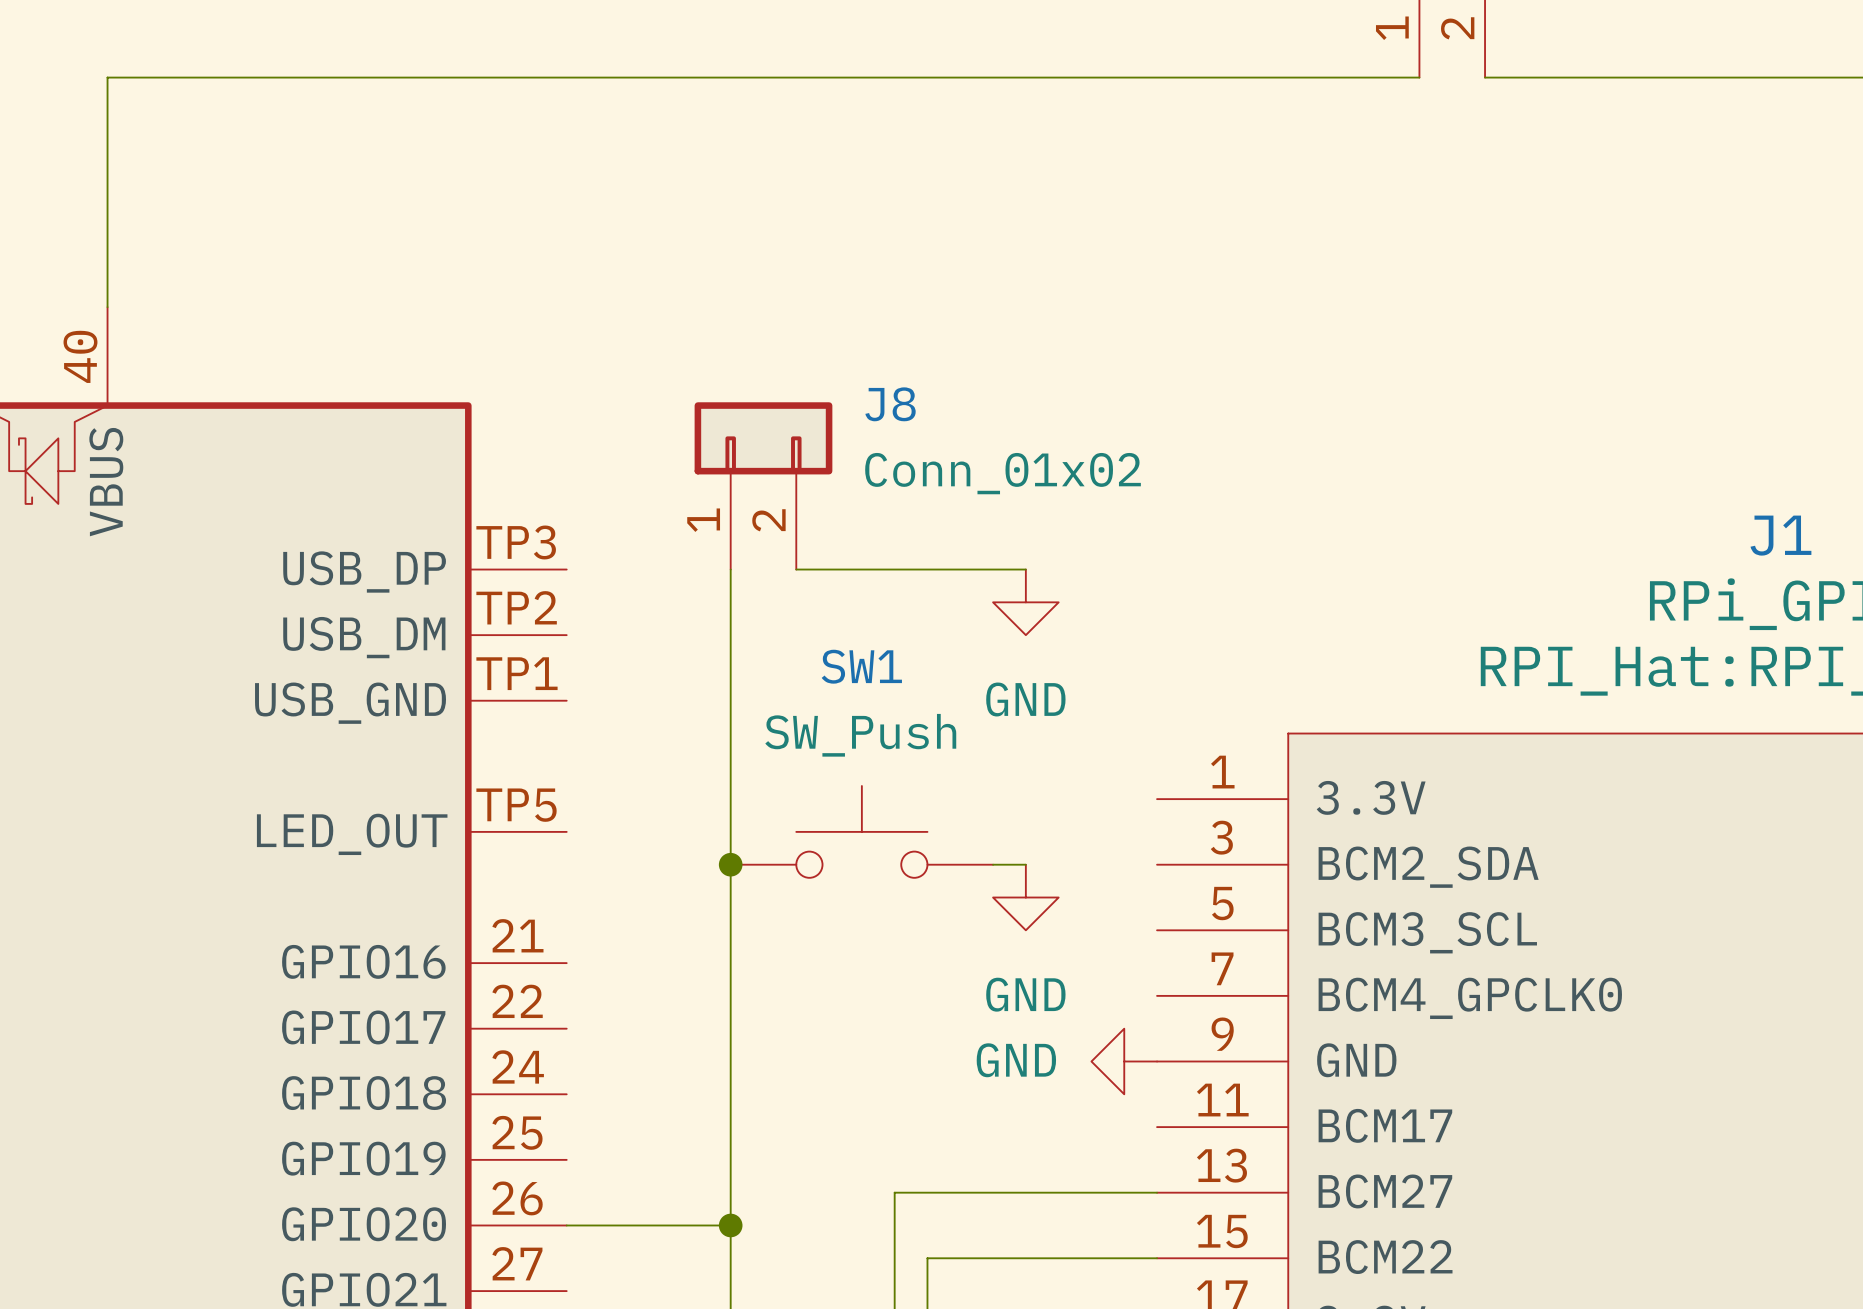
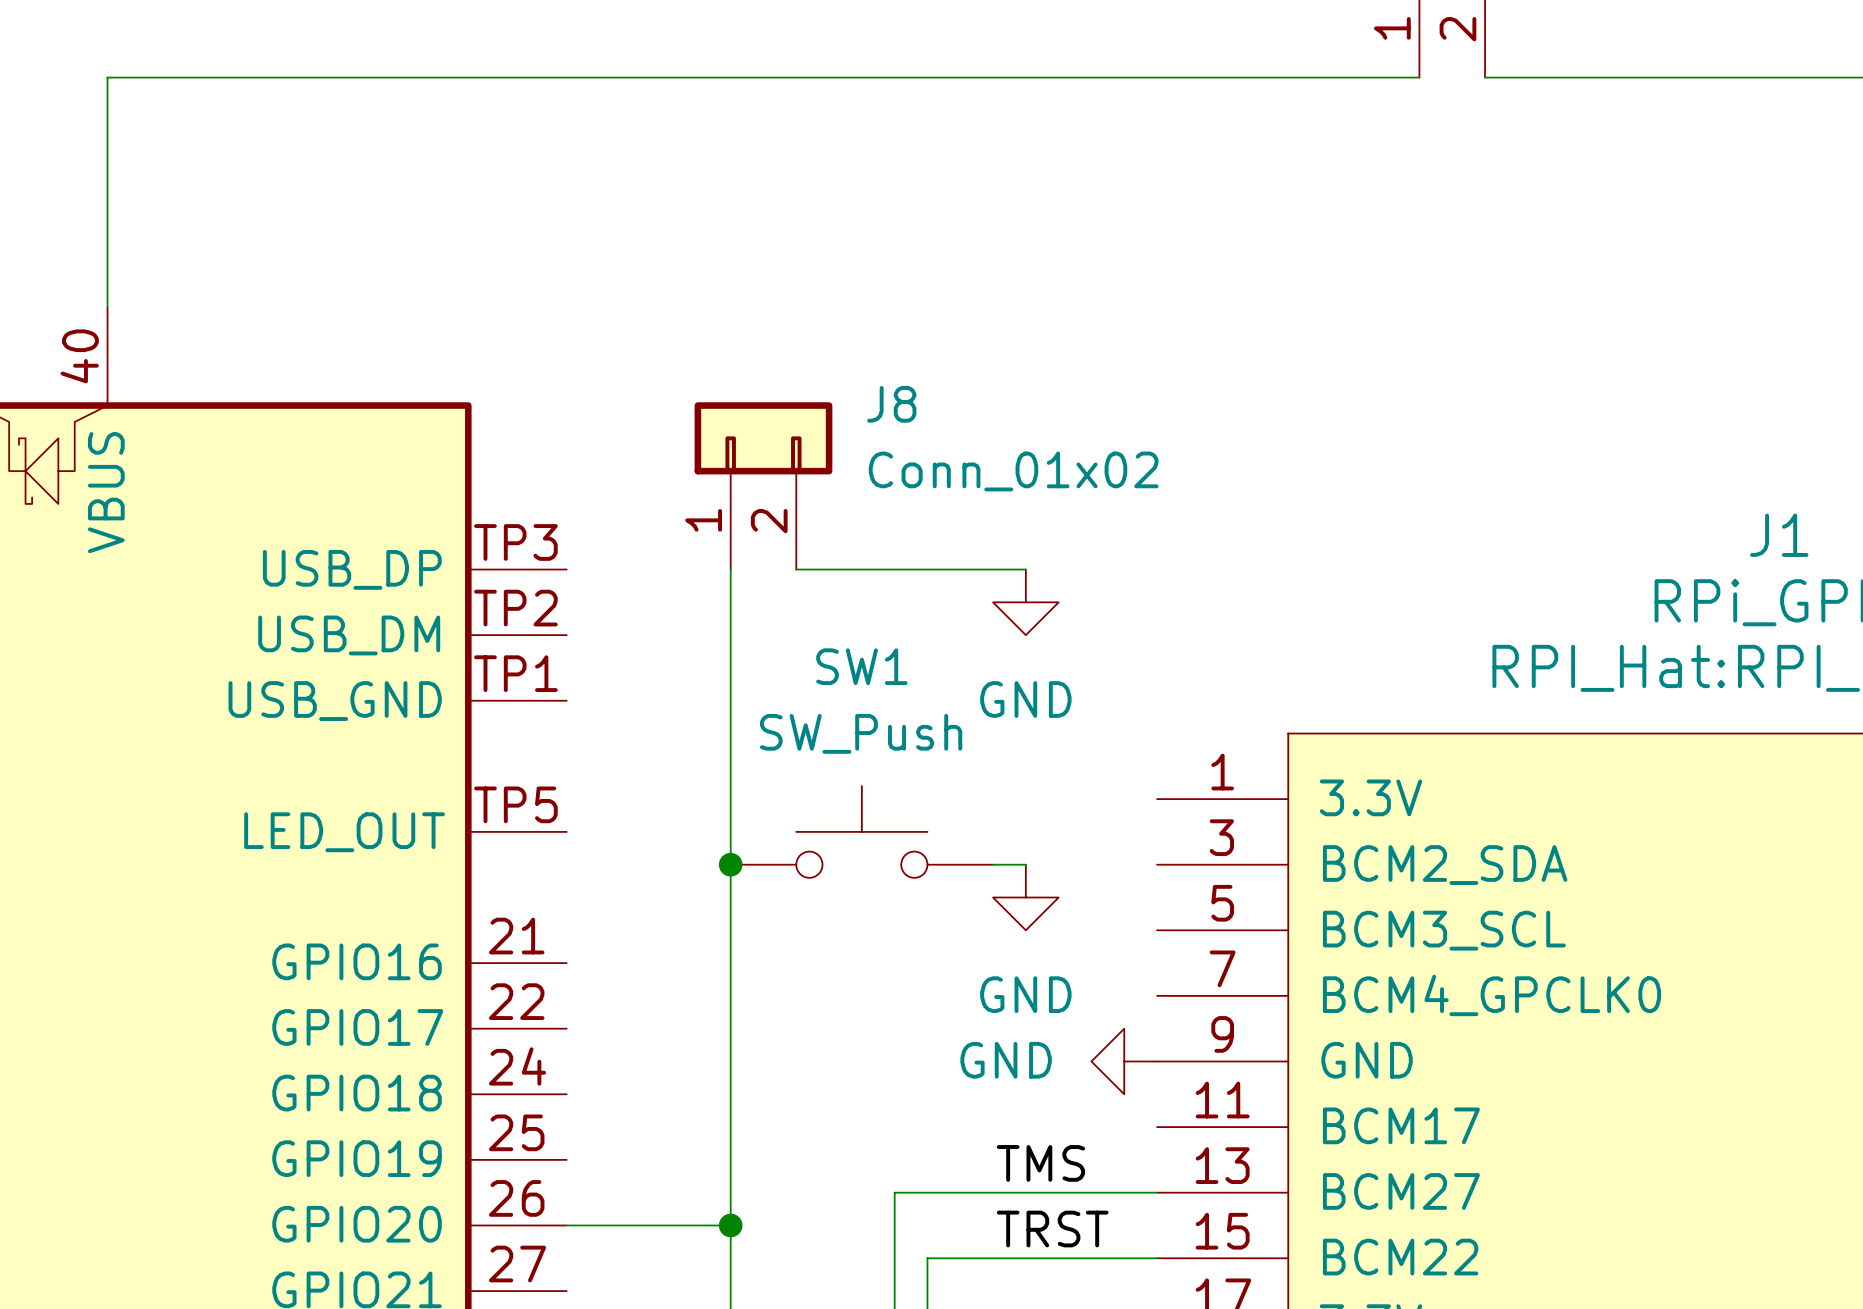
label: none -> TMS (1040, 1163)
label: none -> TRST (1052, 1229)

